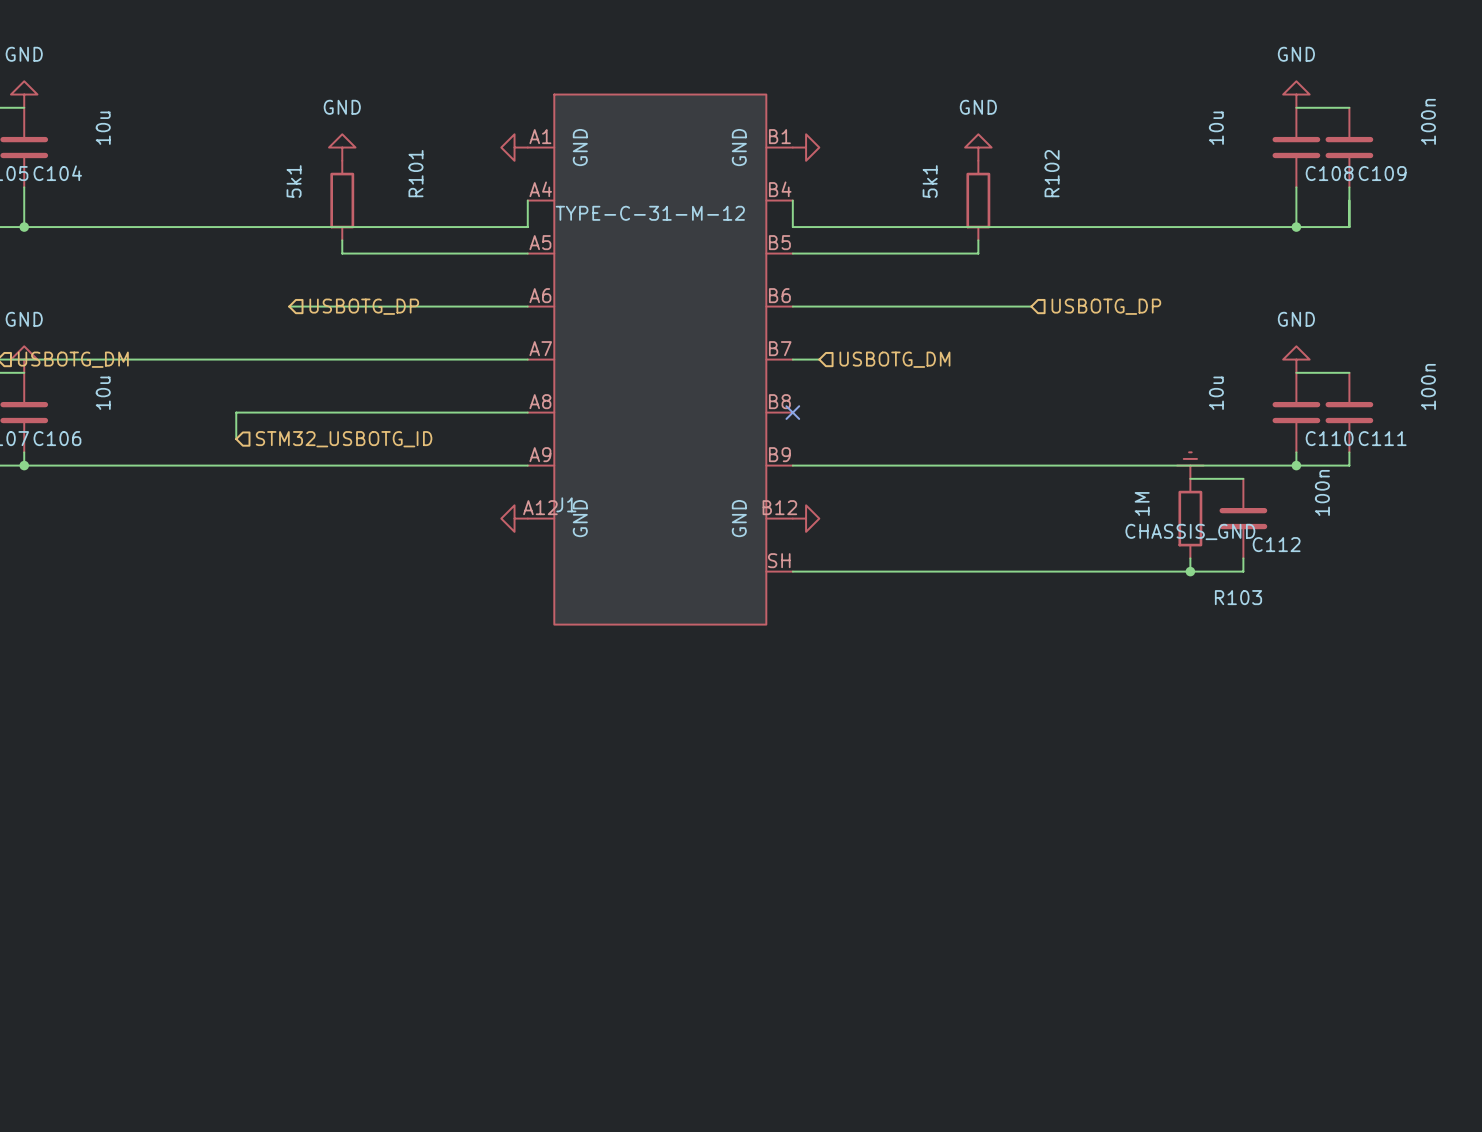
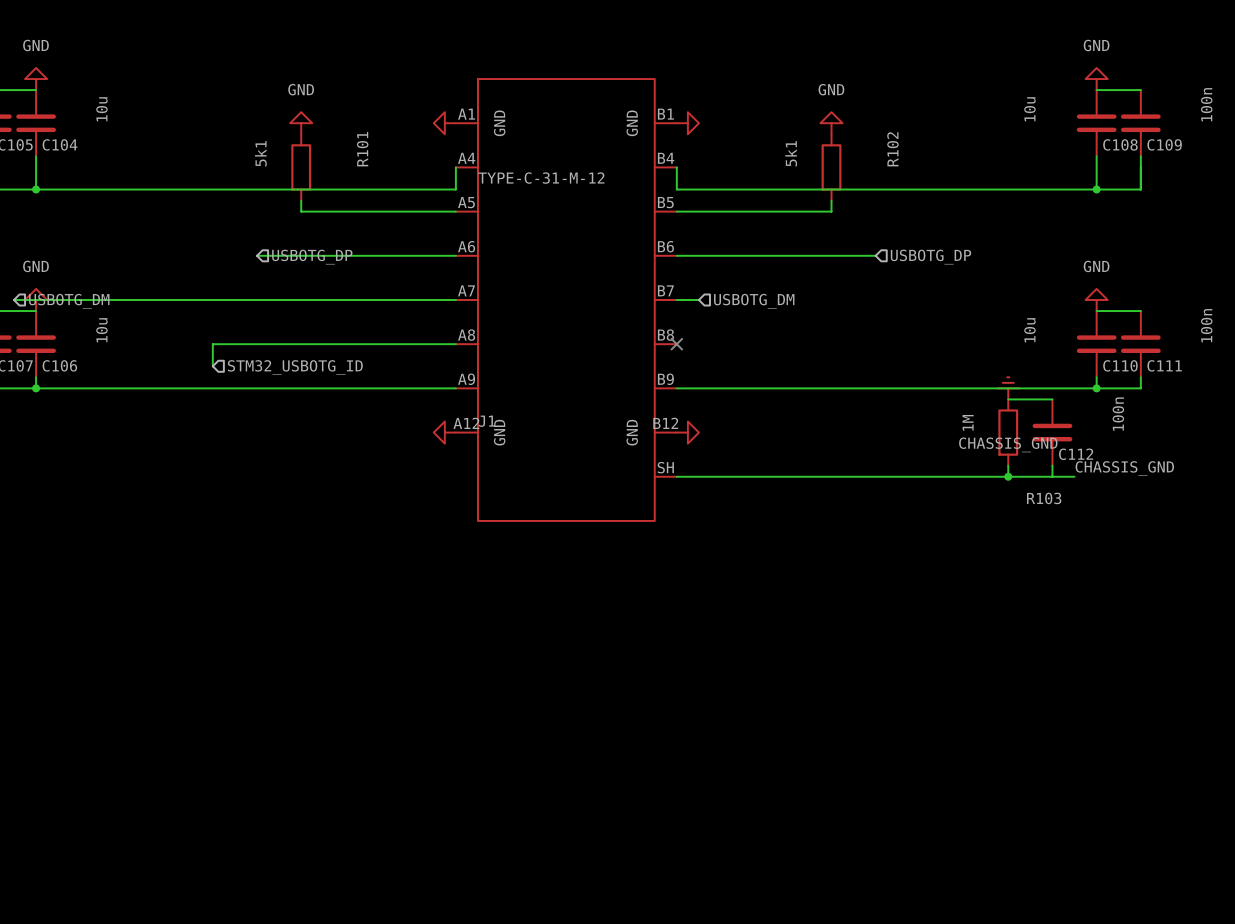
label: none -> CHASSIS_GND (1124, 468)
wire: none -> (1052, 476) (1074, 476)

